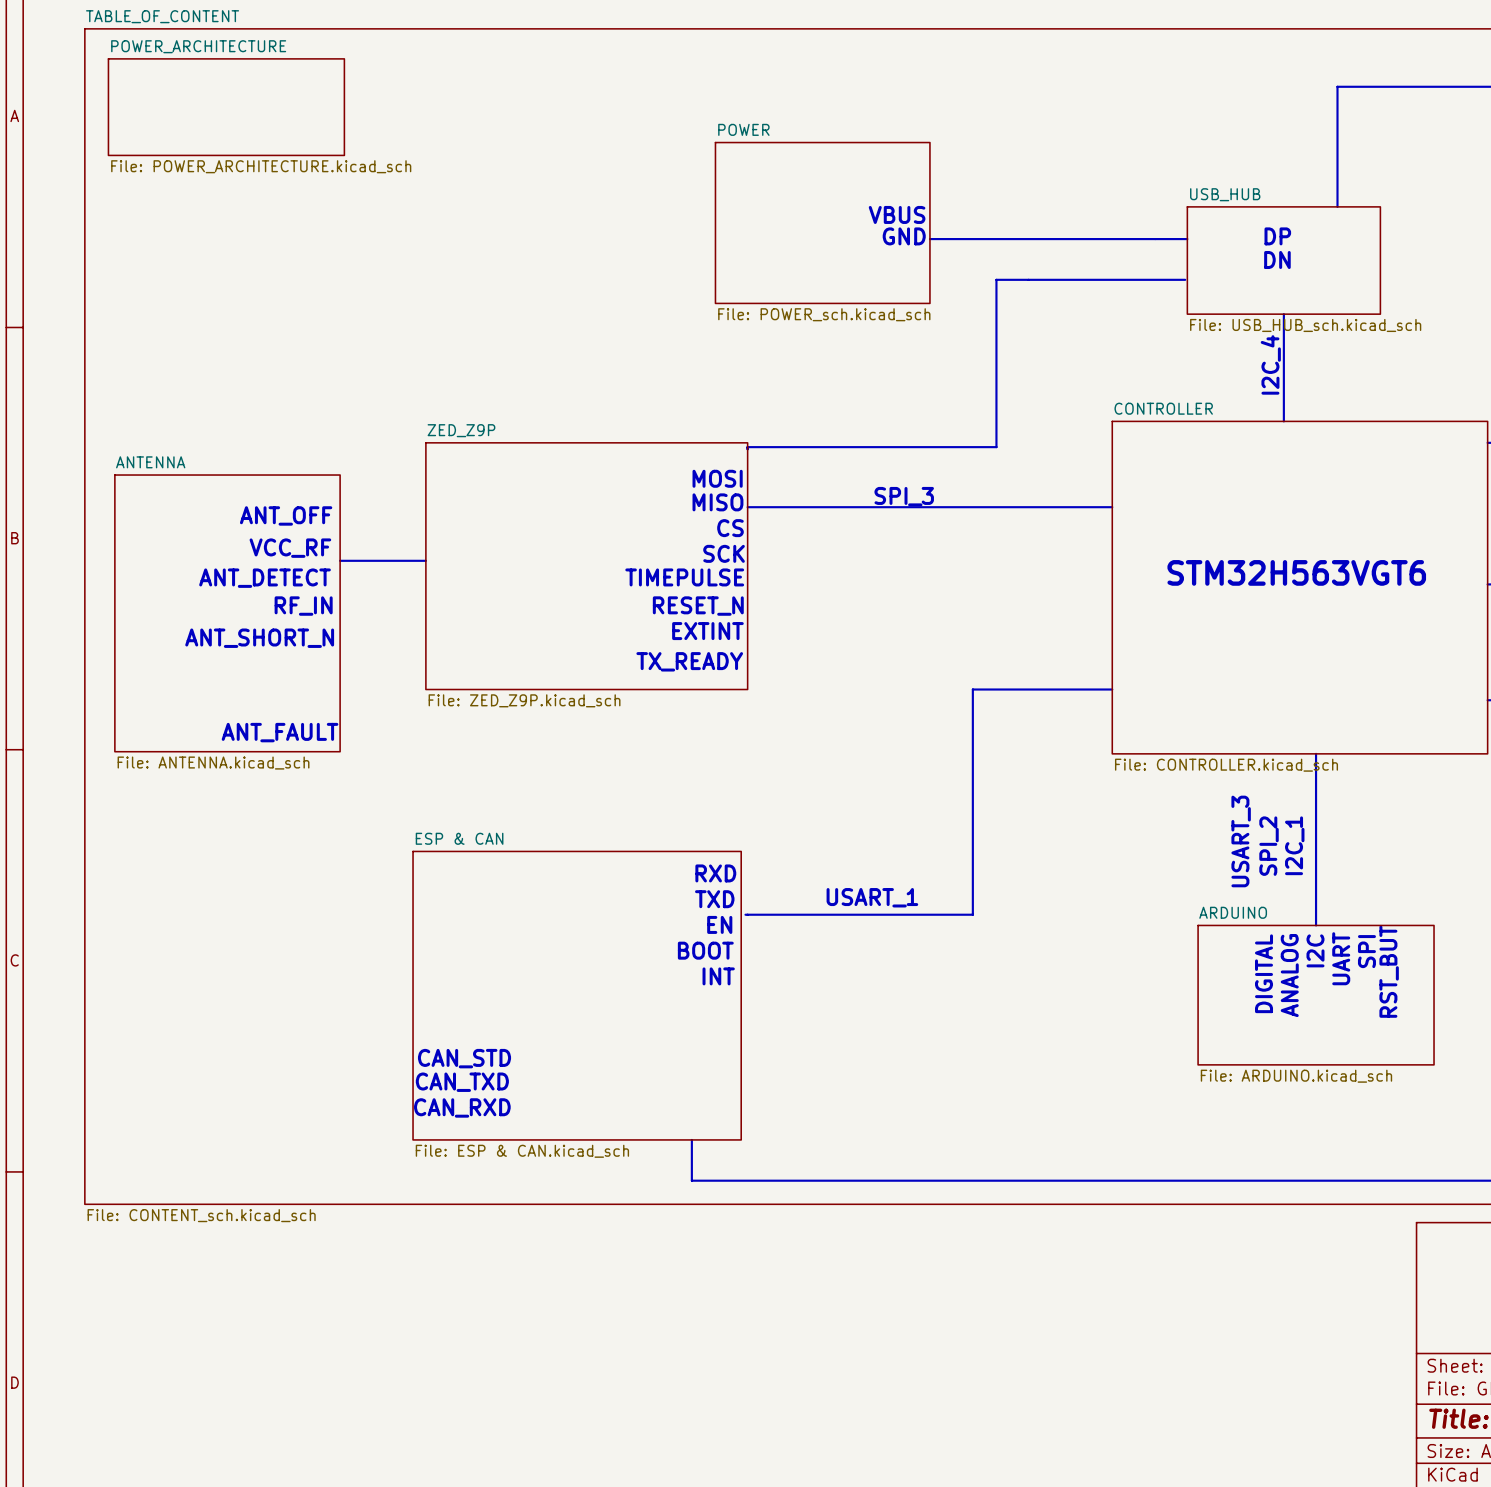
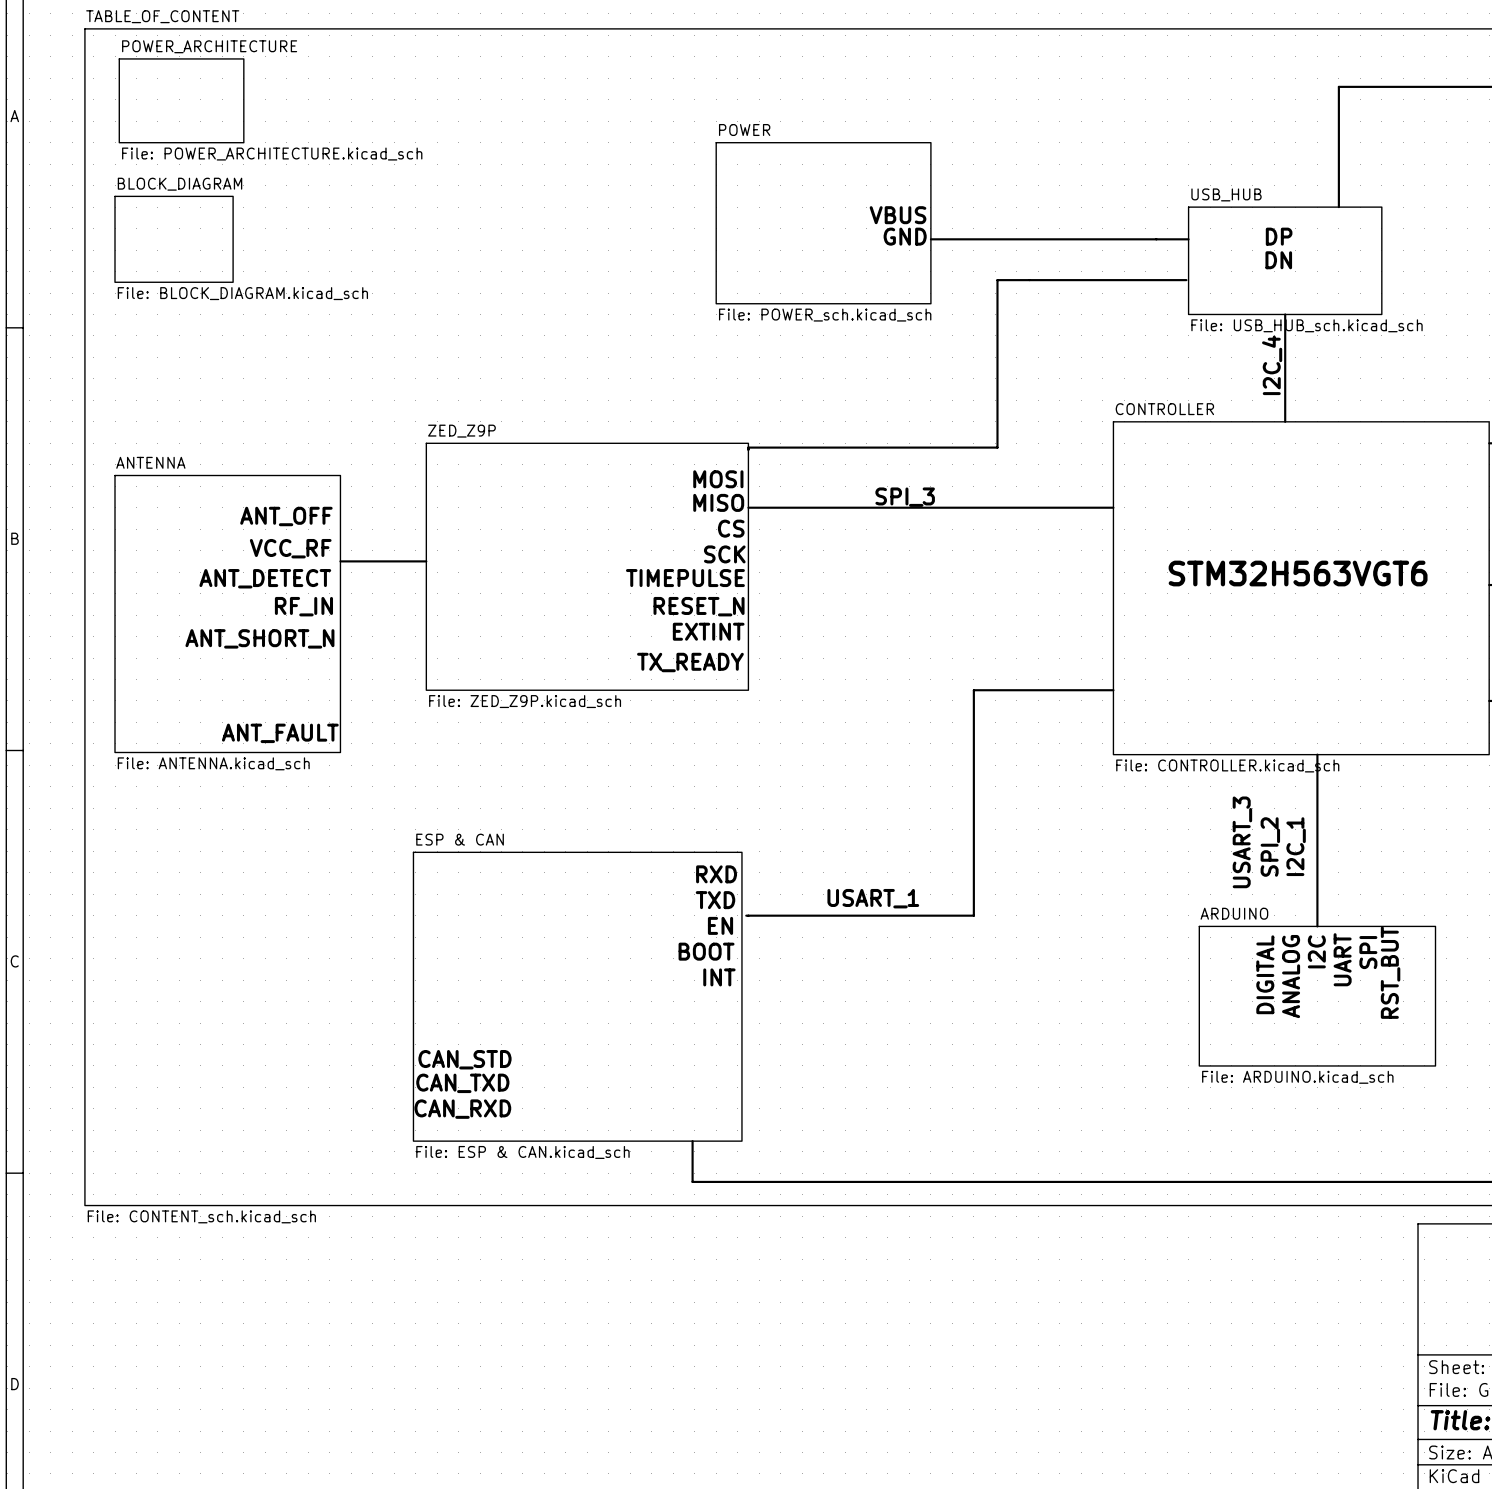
sheet POWER_ARCHITECTURE: none -> File: POWER_ARCHITECTURE.kicad_sch (181, 100)
sheet POWER_ARCHITECTURE: File: POWER_ARCHITECTURE.kicad_sch (226, 107) -> none
sheet BLOCK_DIAGRAM: none -> File: BLOCK_DIAGRAM.kicad_sch (174, 239)

